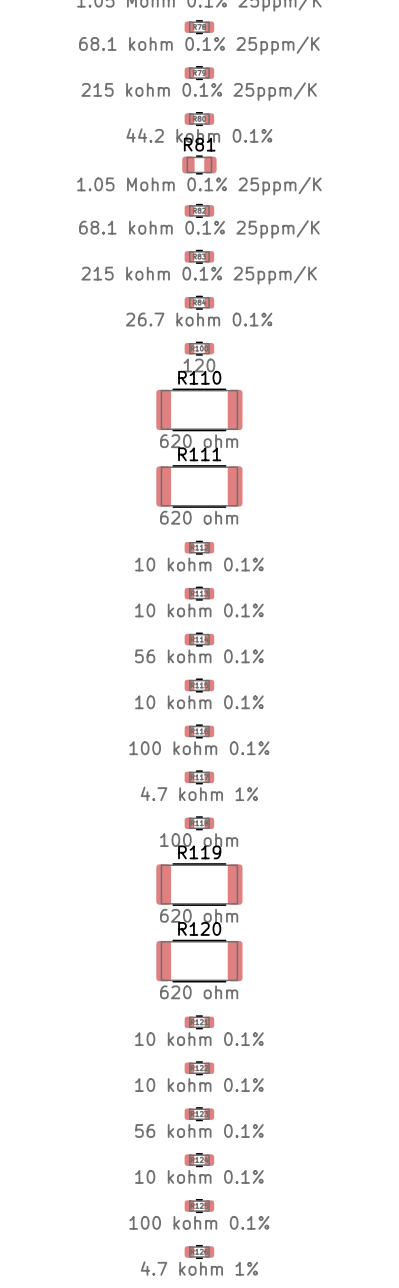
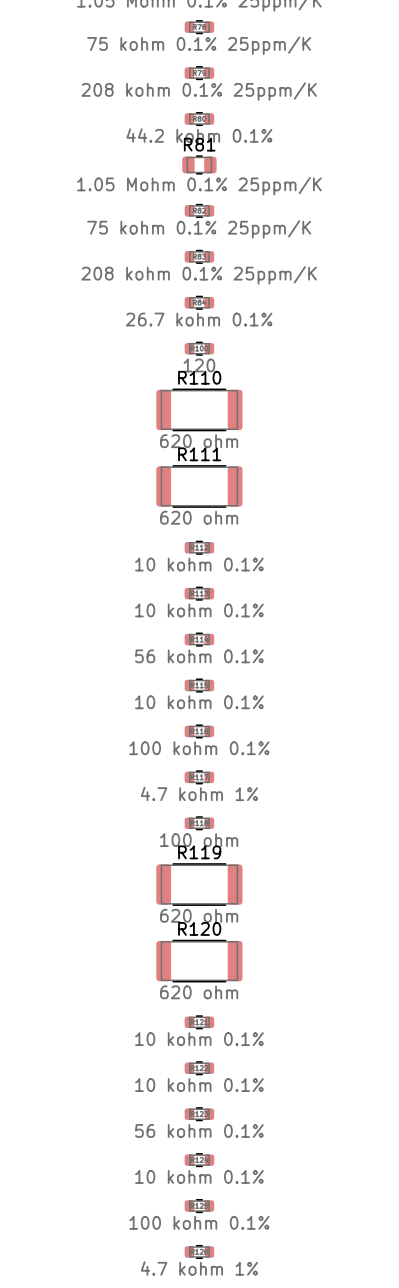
part value: 68.1 kohm 0.1% 25ppm/K (199, 45) -> 75 kohm 0.1% 25ppm/K (199, 45)
part value: 215 kohm 0.1% 25ppm/K (199, 91) -> 208 kohm 0.1% 25ppm/K (199, 91)
part value: 68.1 kohm 0.1% 25ppm/K (199, 229) -> 75 kohm 0.1% 25ppm/K (199, 229)
part value: 215 kohm 0.1% 25ppm/K (199, 275) -> 208 kohm 0.1% 25ppm/K (199, 275)

